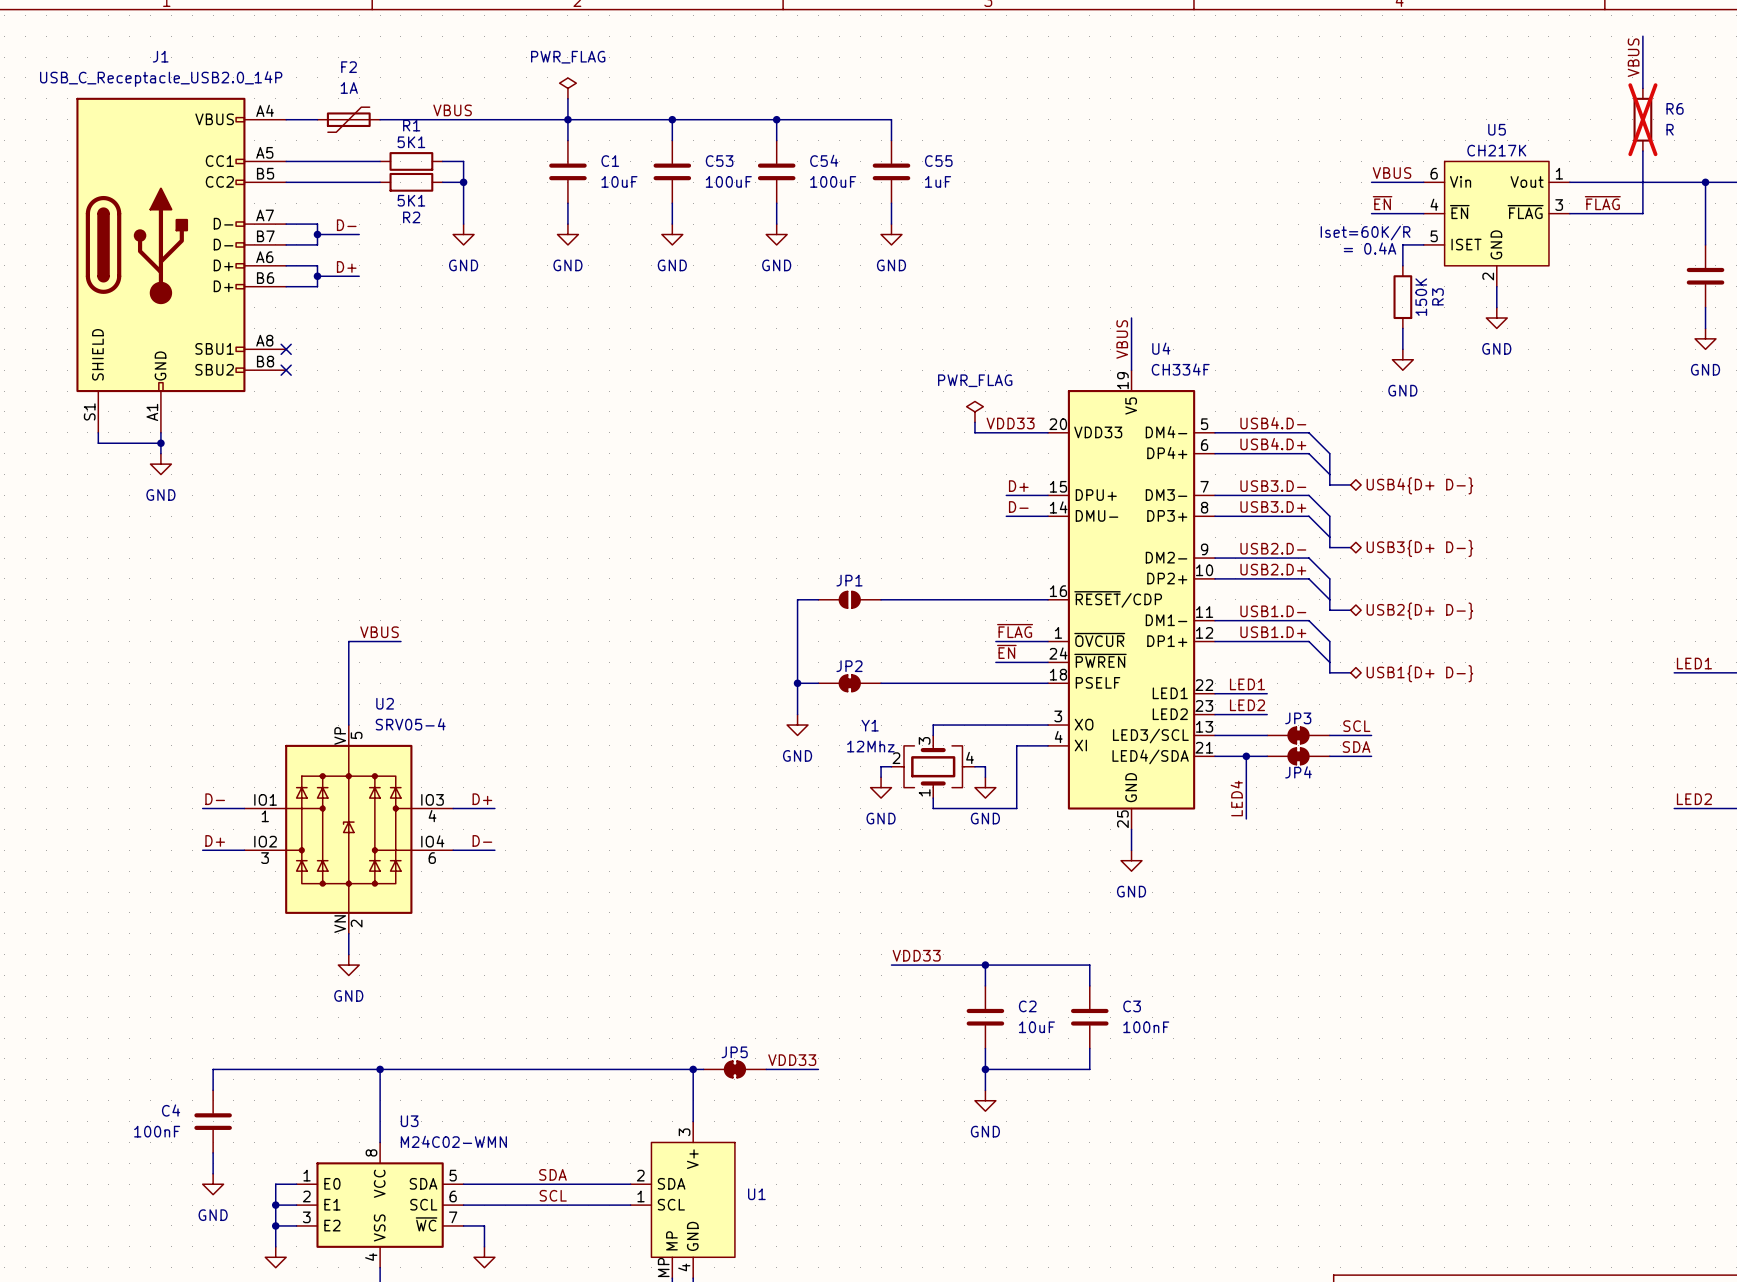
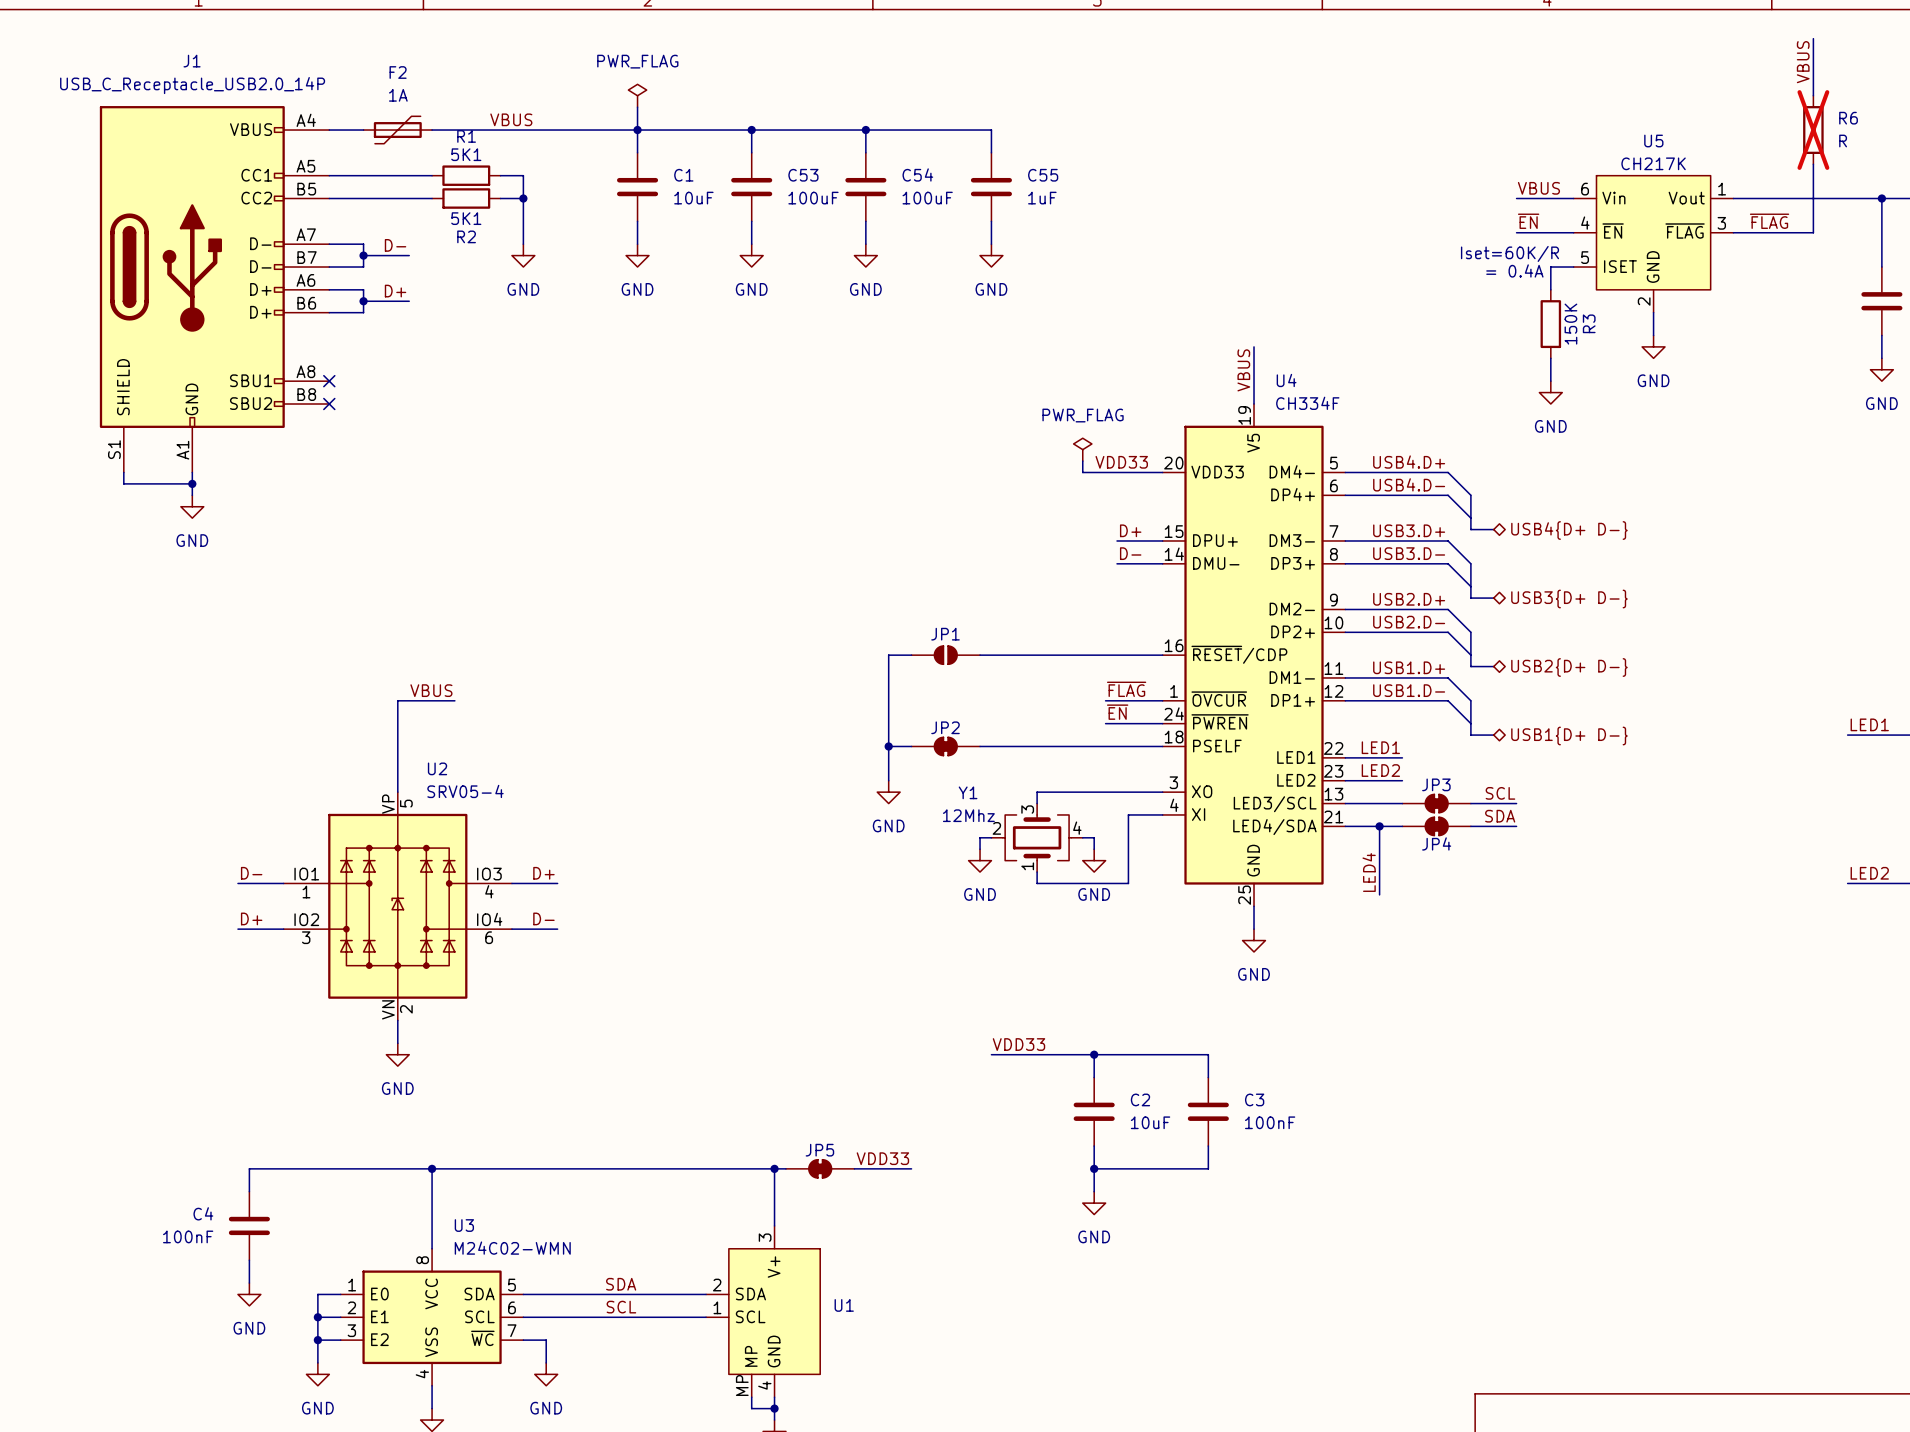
label: USB4.D- (1273, 423) -> USB4.D+ (1409, 462)
label: USB4.D+ (1273, 444) -> USB4.D- (1409, 484)
label: USB3.D- (1273, 486) -> USB3.D+ (1409, 530)
label: USB3.D+ (1273, 506) -> USB3.D- (1409, 553)
label: USB2.D- (1273, 548) -> USB2.D+ (1409, 599)
label: USB2.D+ (1273, 569) -> USB2.D- (1409, 622)
label: USB1.D- (1273, 611) -> USB1.D+ (1409, 667)
label: USB1.D+ (1273, 632) -> USB1.D- (1409, 690)

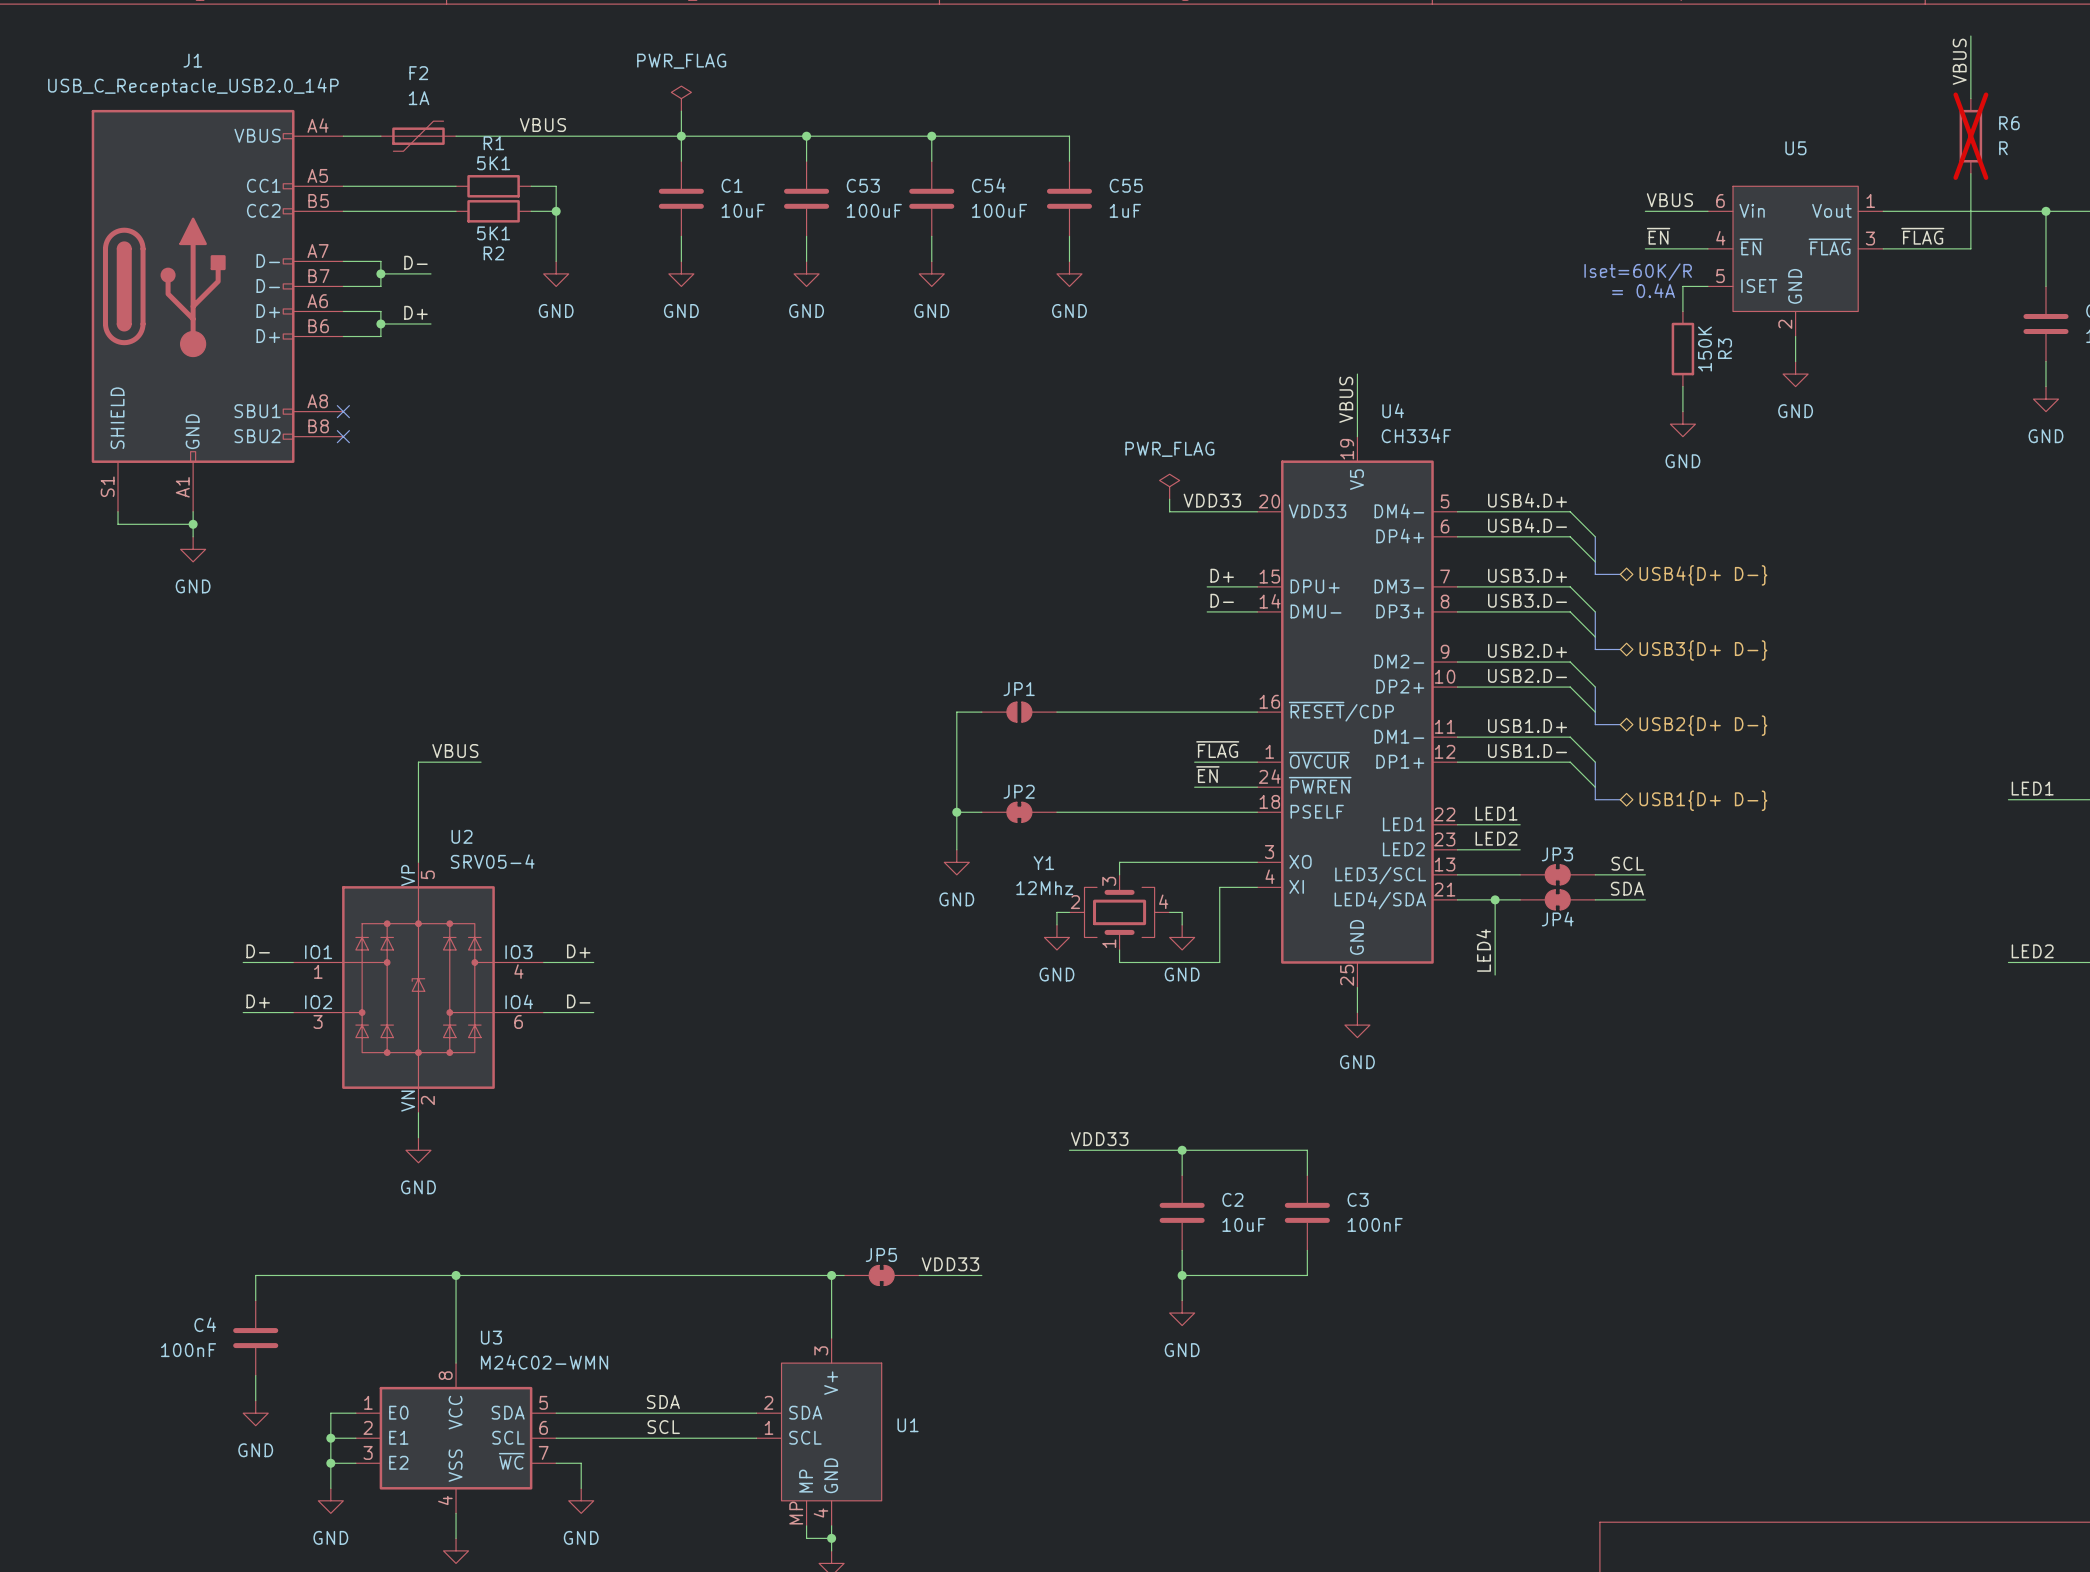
U5 value: CH217K (1653, 163) -> none

